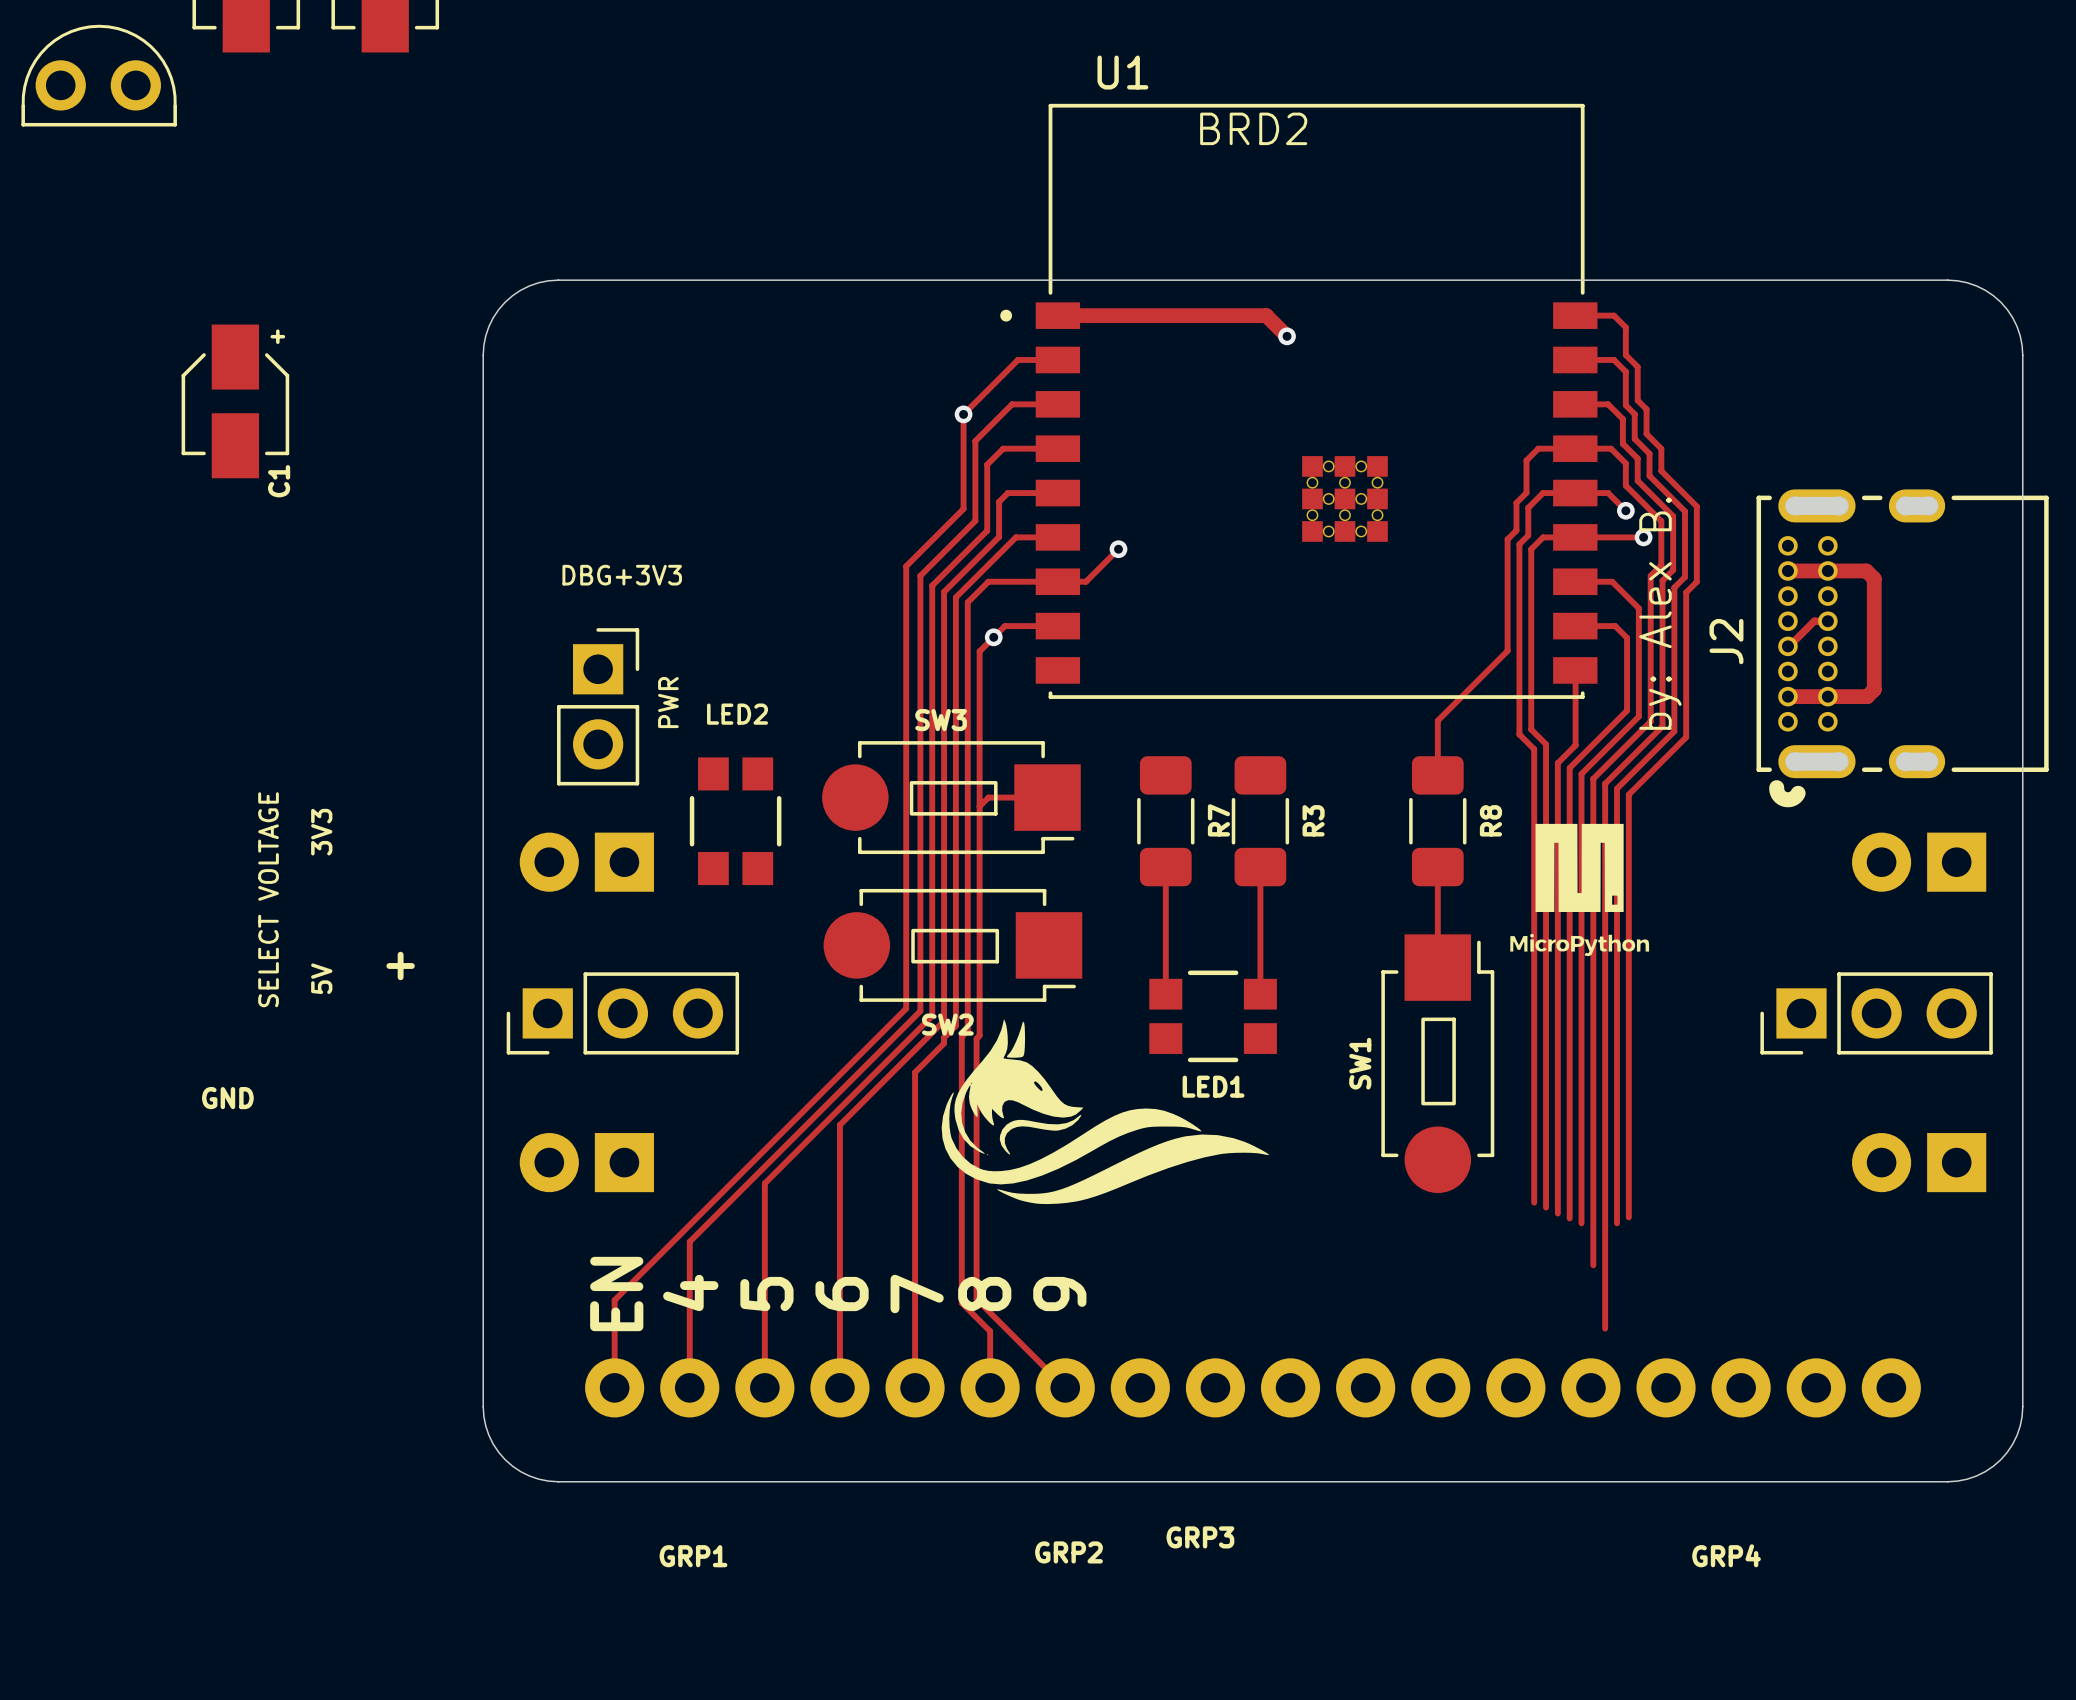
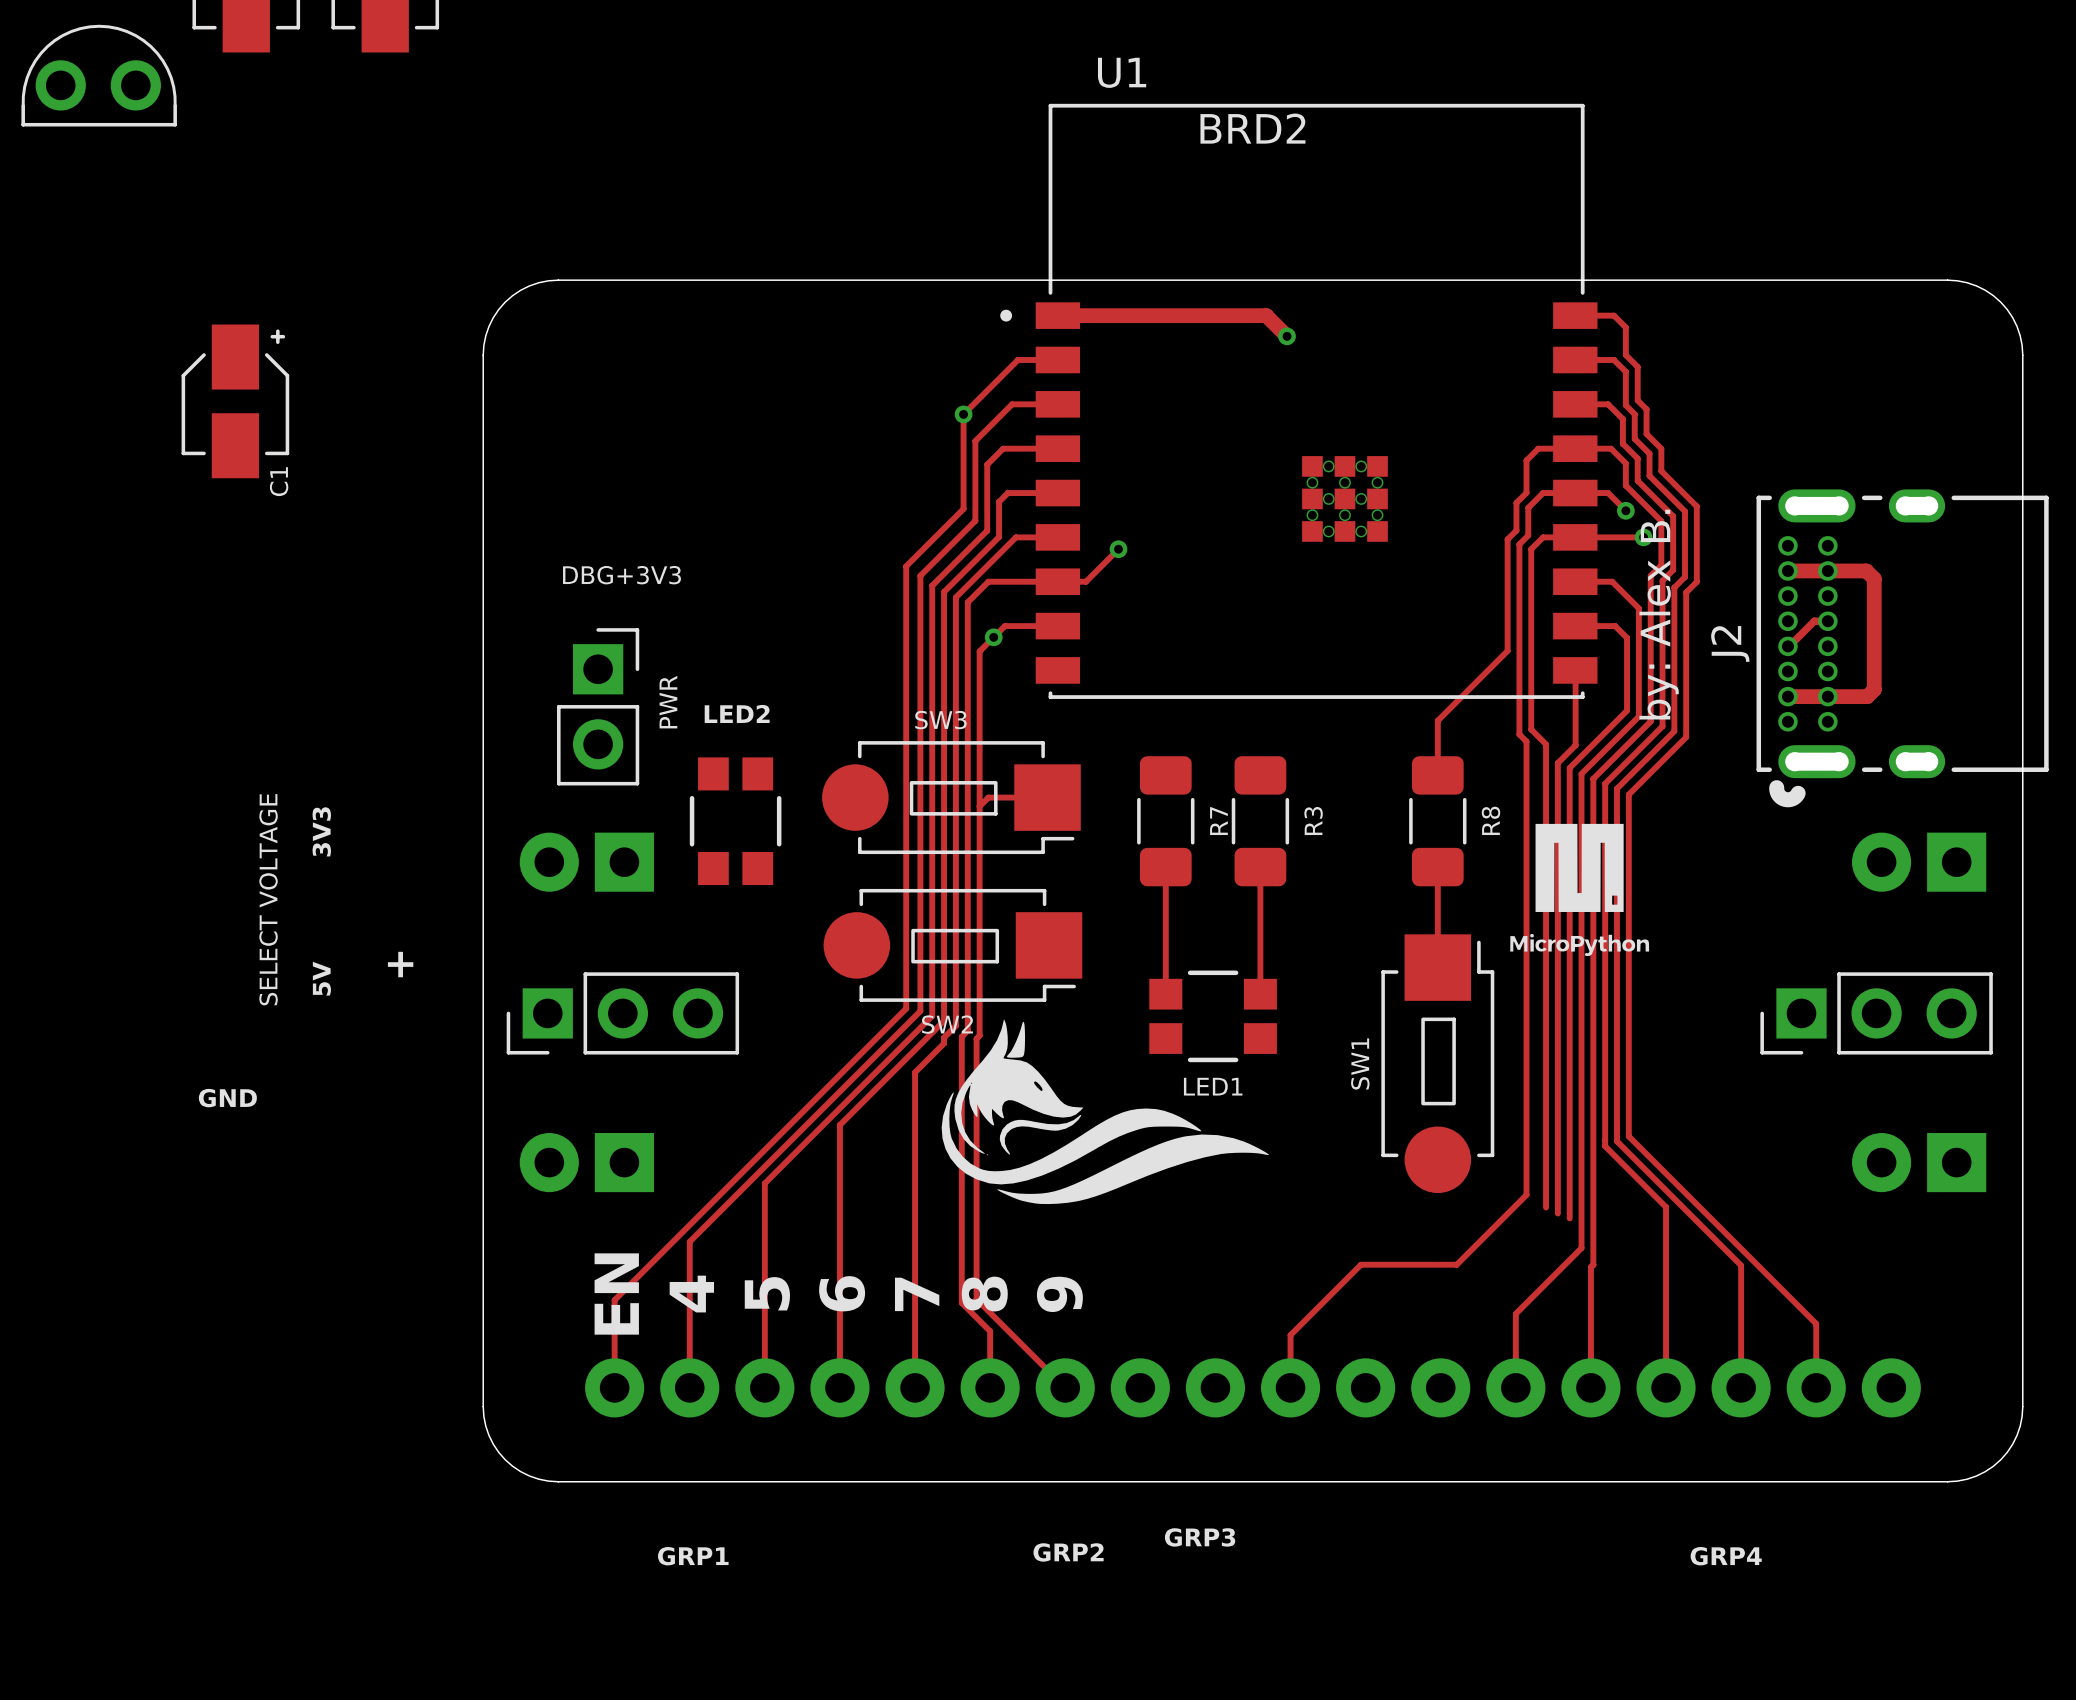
track: (1526, 741) (1534, 749) (1534, 1202) -> (1526, 741) (1526, 1194) (1456, 1264) (1360, 1264) (1290, 1335) (1290, 1387)
track: (1628, 1136) (1628, 1217) -> (1628, 1136) (1816, 1323) (1816, 1387)
track: (1616, 1141) (1616, 1223) -> (1616, 1141) (1741, 1265) (1741, 1387)
track: (1605, 1146) (1605, 1328) -> (1605, 1146) (1666, 1207) (1666, 1387)
track: none -> (1581, 1223) (1581, 1248) (1515, 1313) (1515, 1387)
track: none -> (1593, 1264) (1590, 1267) (1590, 1387)

